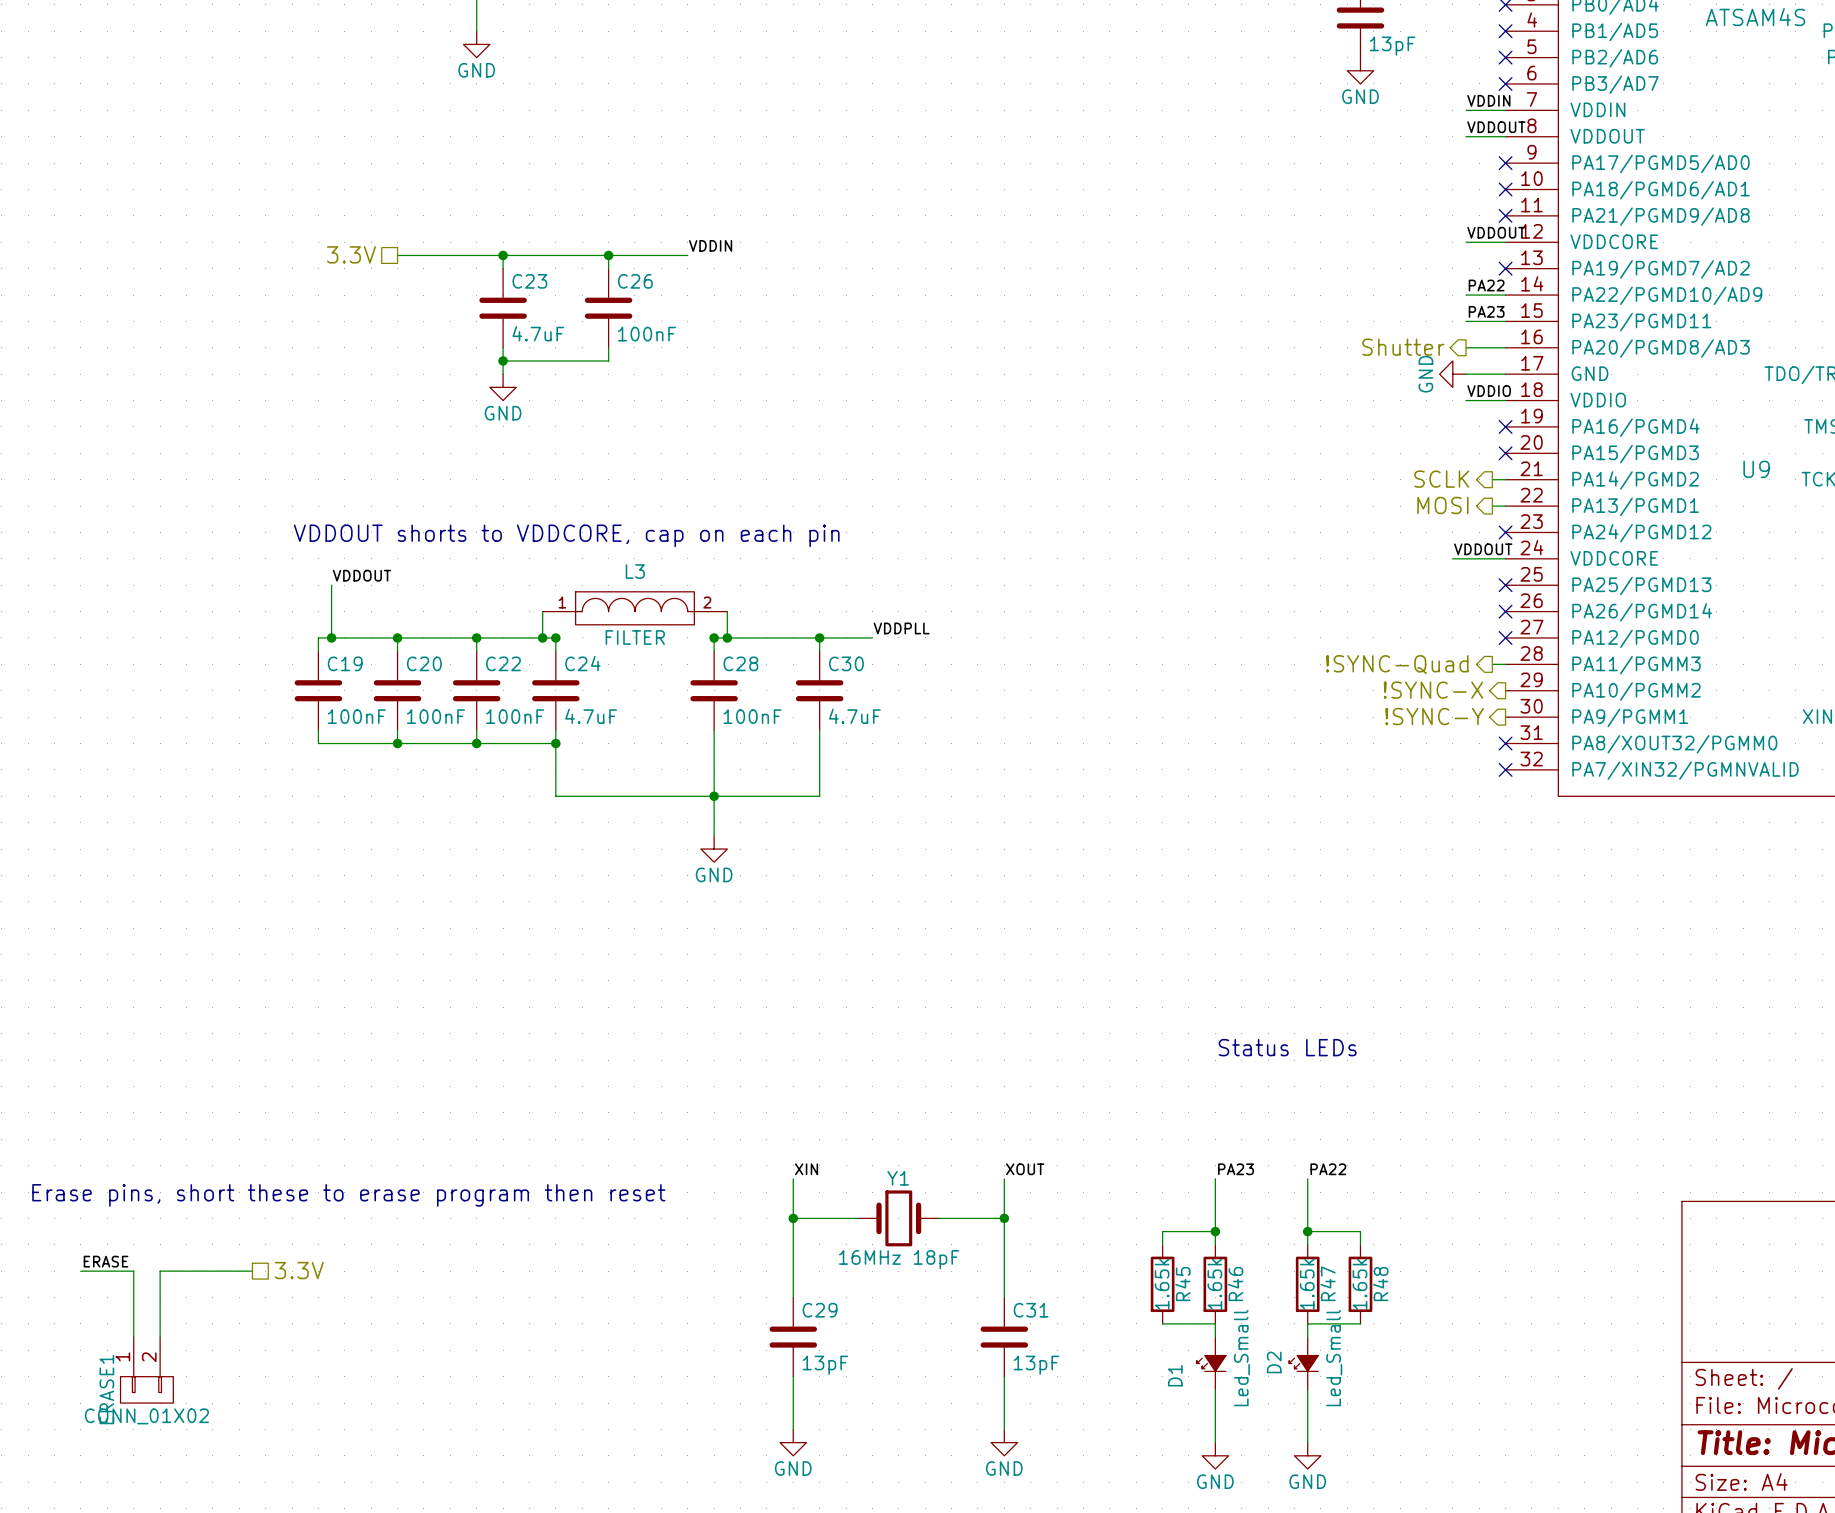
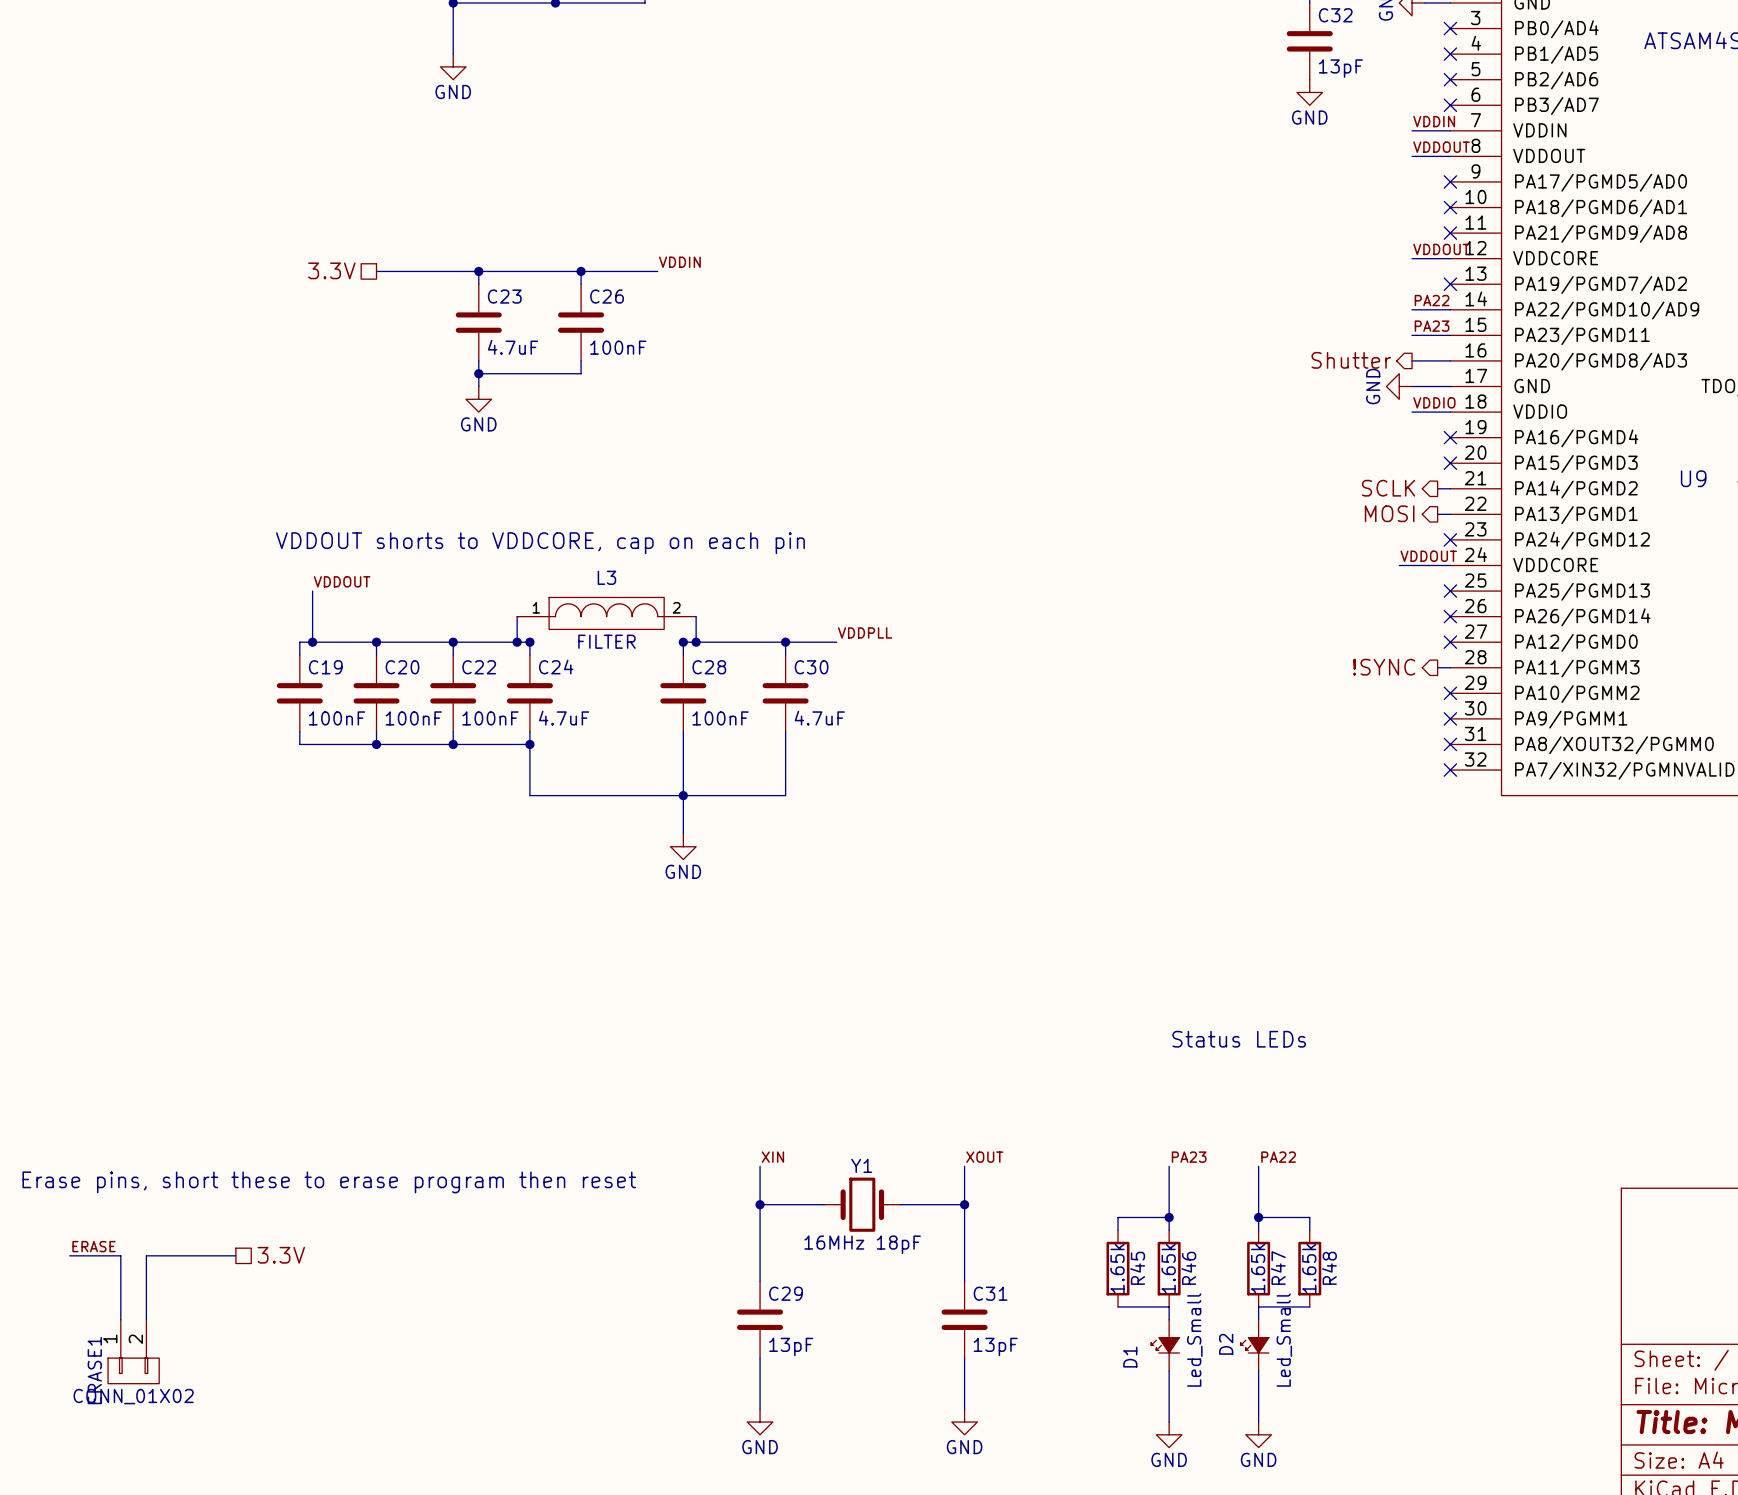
hierarchical label: !SYNC-Quad (1397, 664) -> !SYNC (1384, 667)
hierarchical label: !SYNC-X (1433, 690) -> none
no-connect mark: none -> (1450, 693)
hierarchical label: !SYNC-Y (1434, 716) -> none
no-connect mark: none -> (1450, 718)

